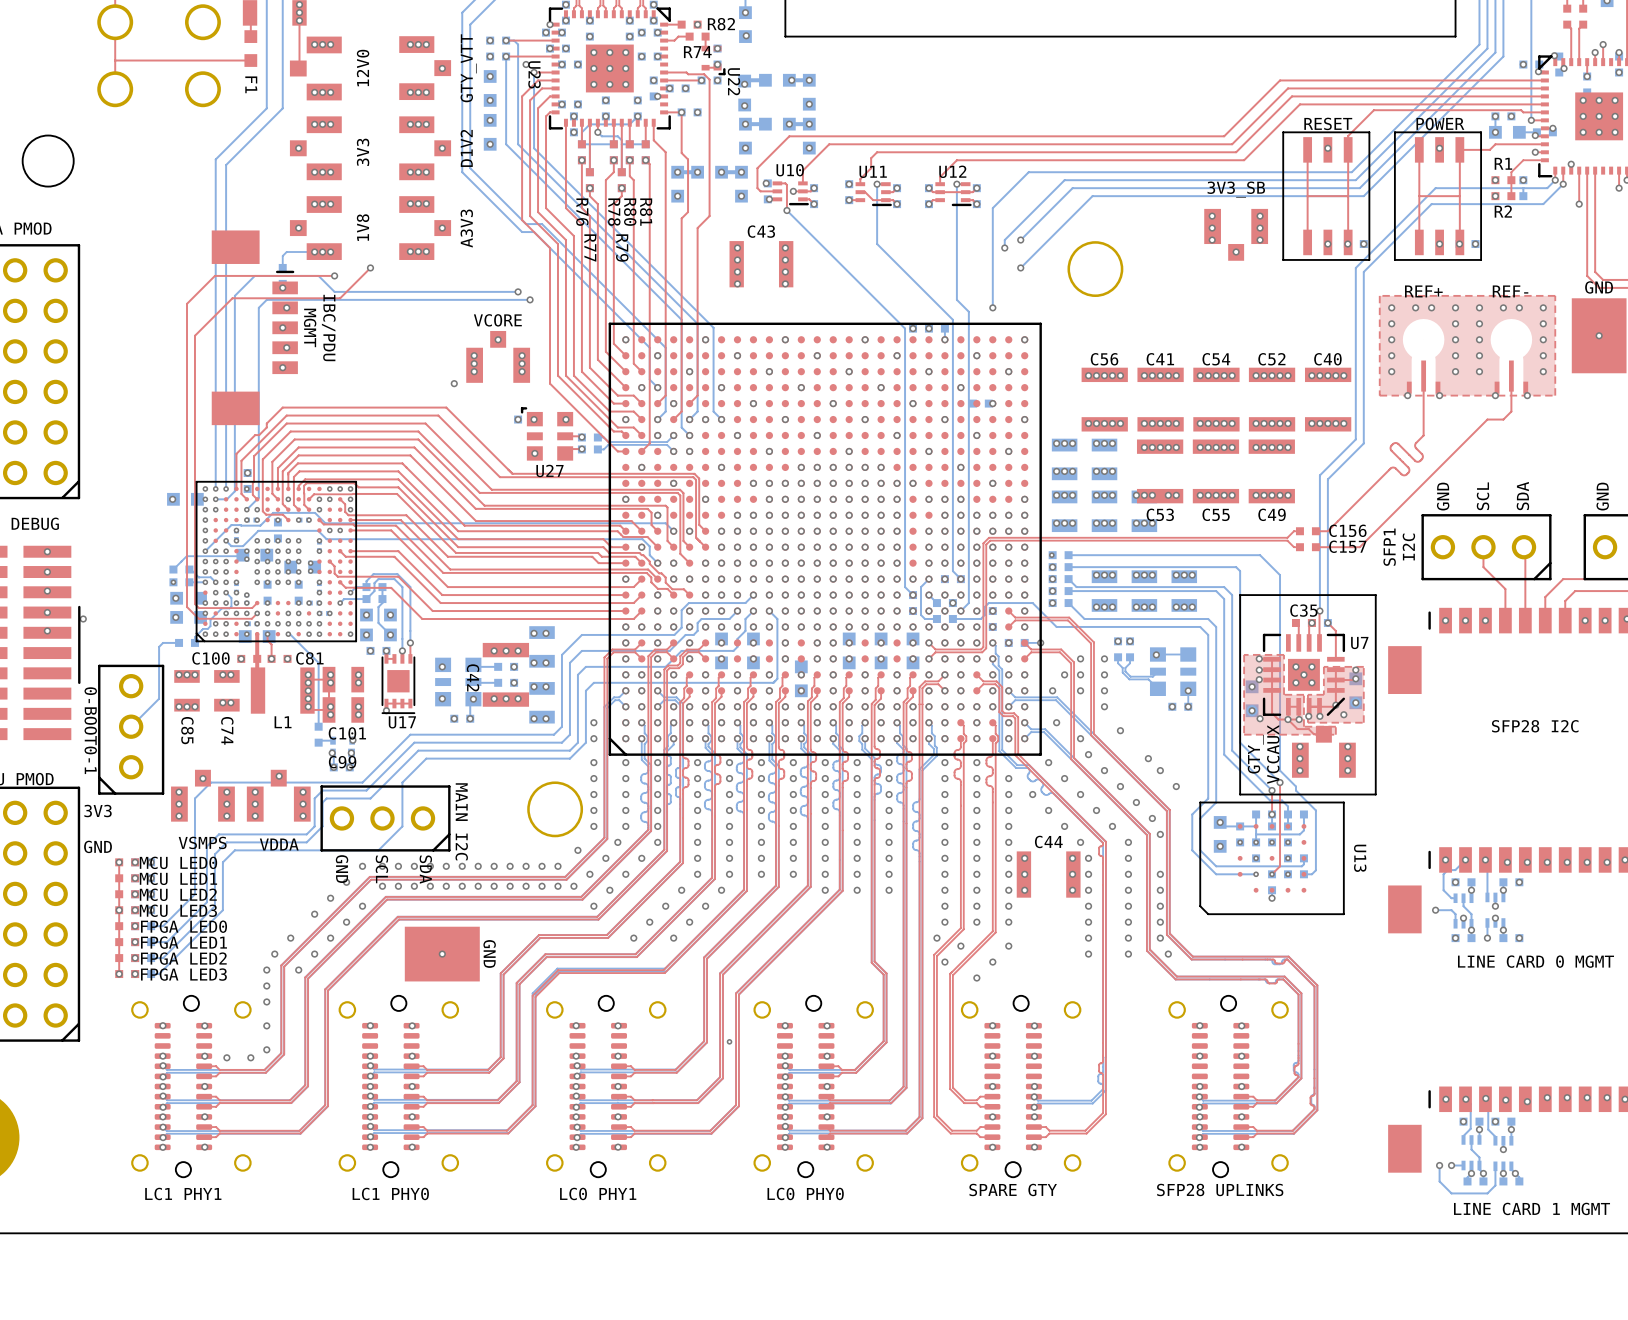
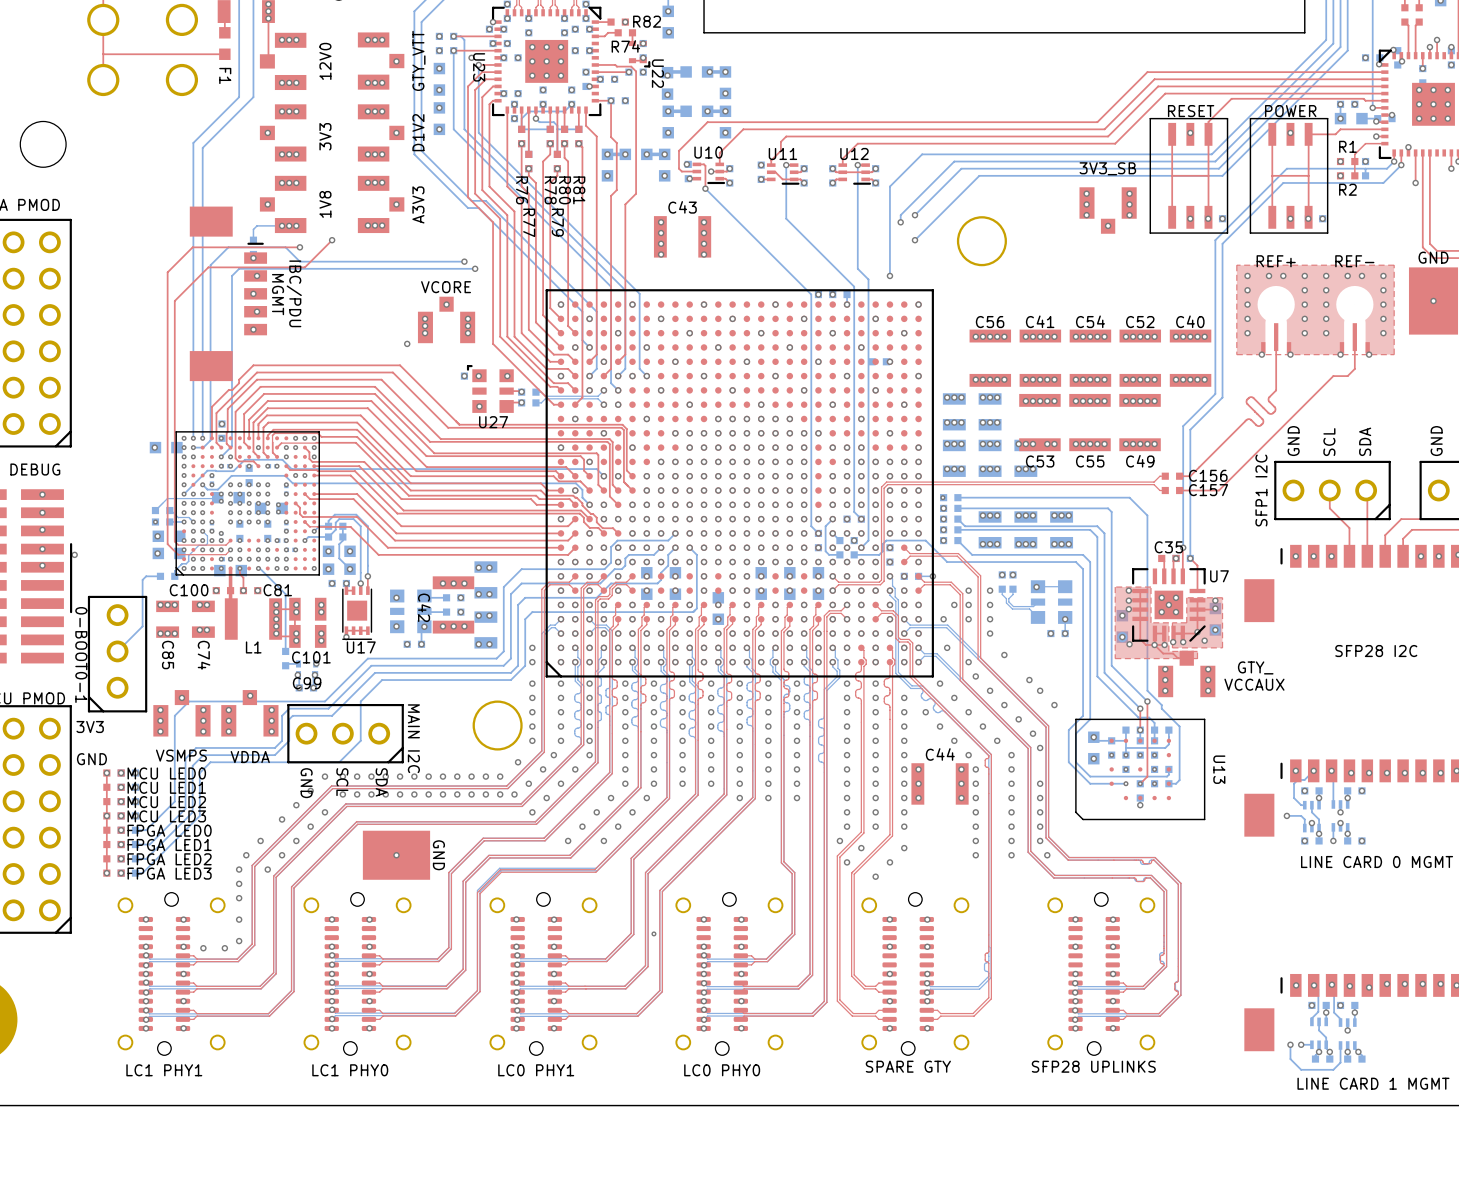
text: SFP1 (1389, 547) -> none
text: I2C (1408, 547) -> SFP1 I2C (1261, 490)
line: (1240, 595) (1375, 595) (1375, 794) (1240, 794) (1240, 595) -> none
text rotation: 0° (1255, 754) -> 90° clockwise (1255, 667)
text position: GTY_ (1255, 754) -> GTY_ (1255, 667)
text rotation: 0° (1273, 754) -> 90° clockwise (1254, 684)
text position: VCCAUX (1273, 754) -> VCCAUX (1254, 684)

